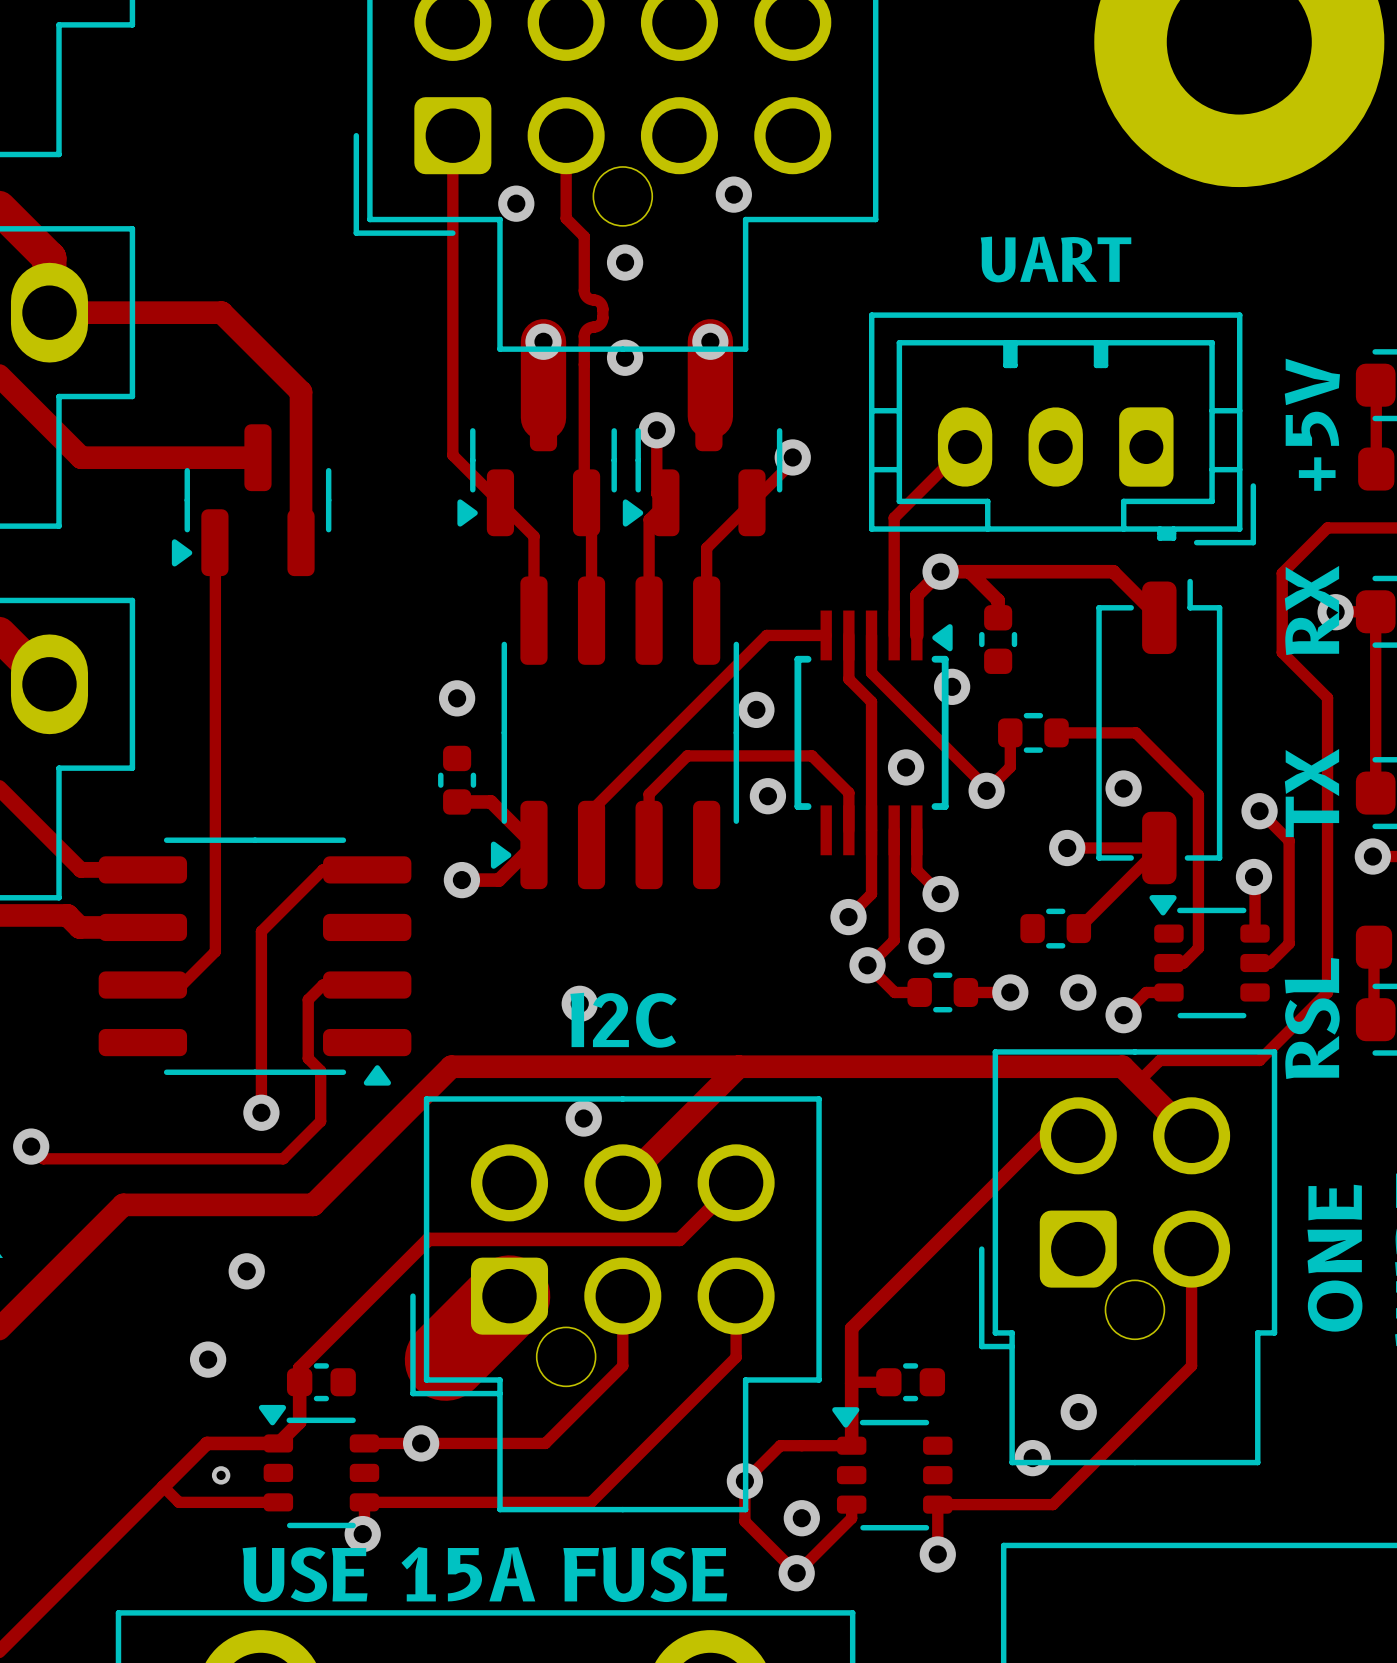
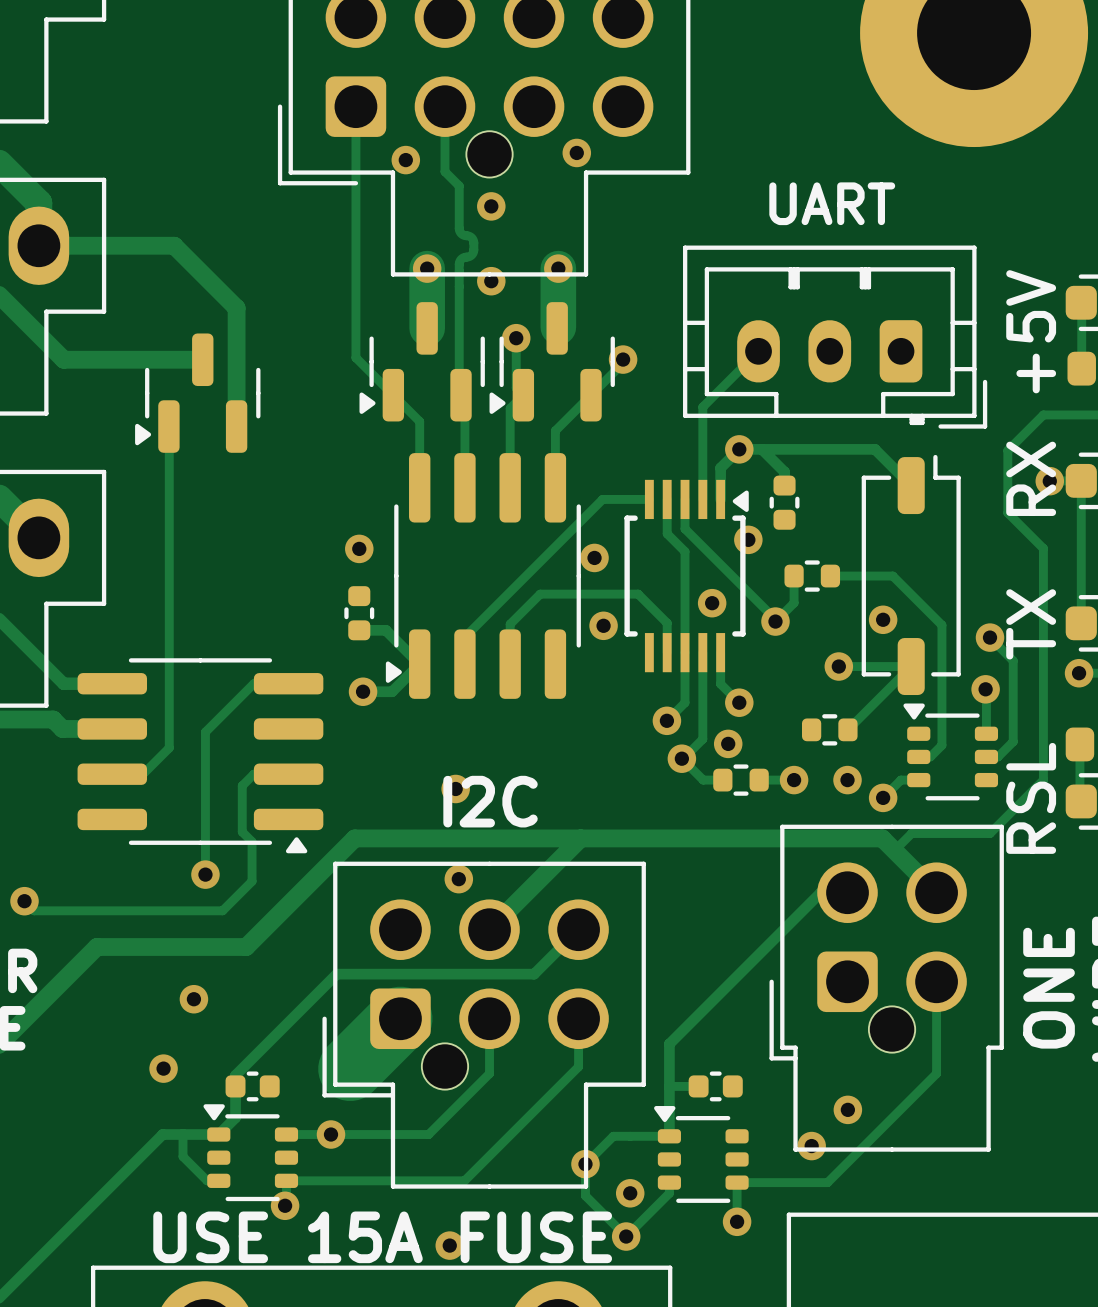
via: (221, 1475) -> none
track: (163, 1486) (179, 1502) (263, 1502) -> (183, 1134) (183, 1156) (207, 1180)
via: none -> (449, 1245)

